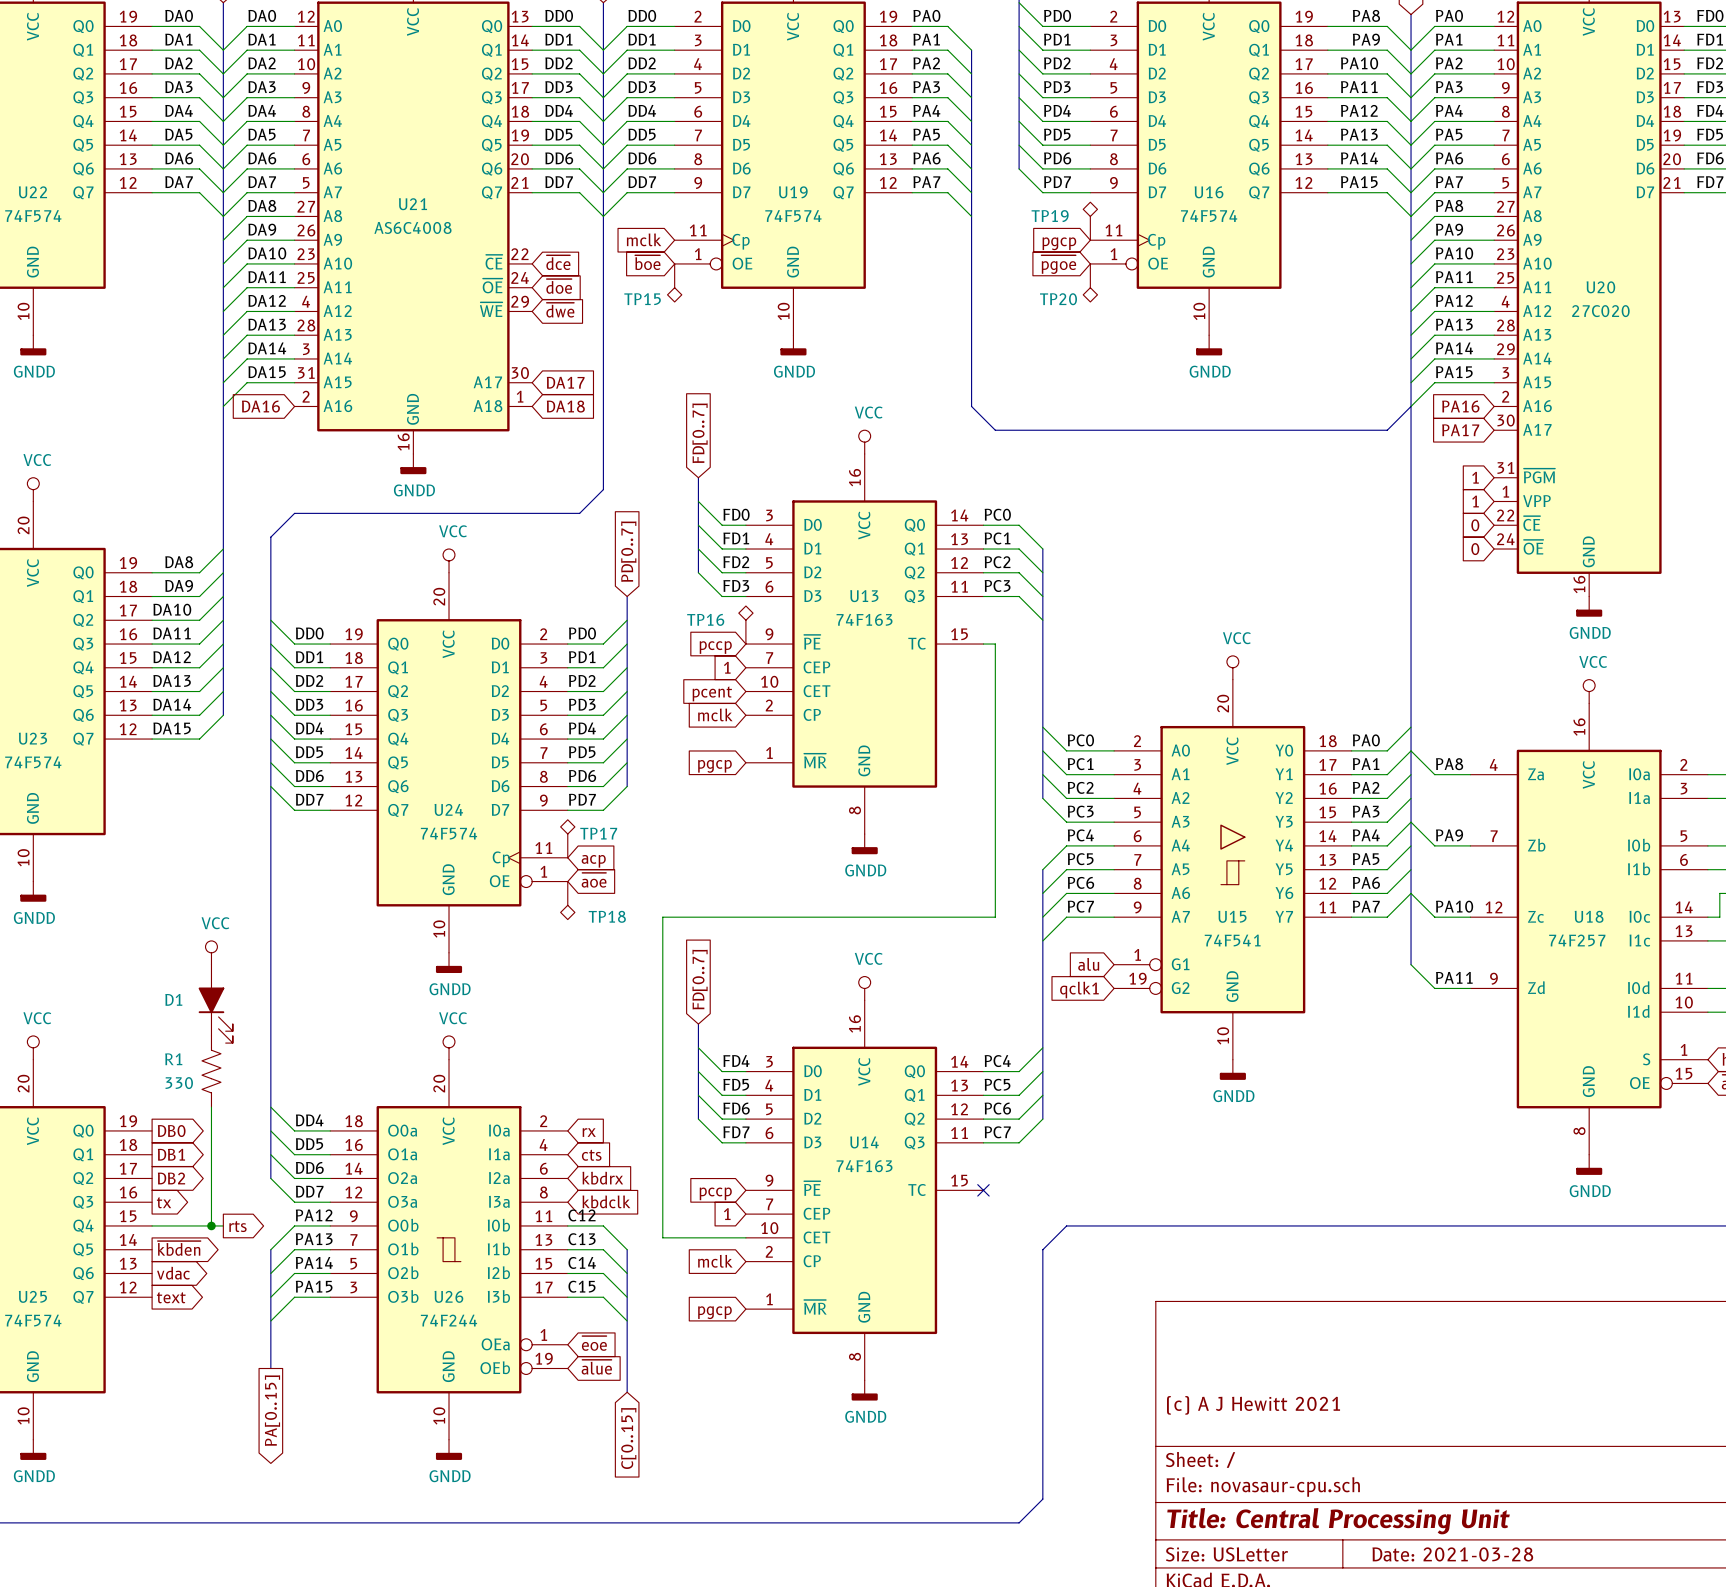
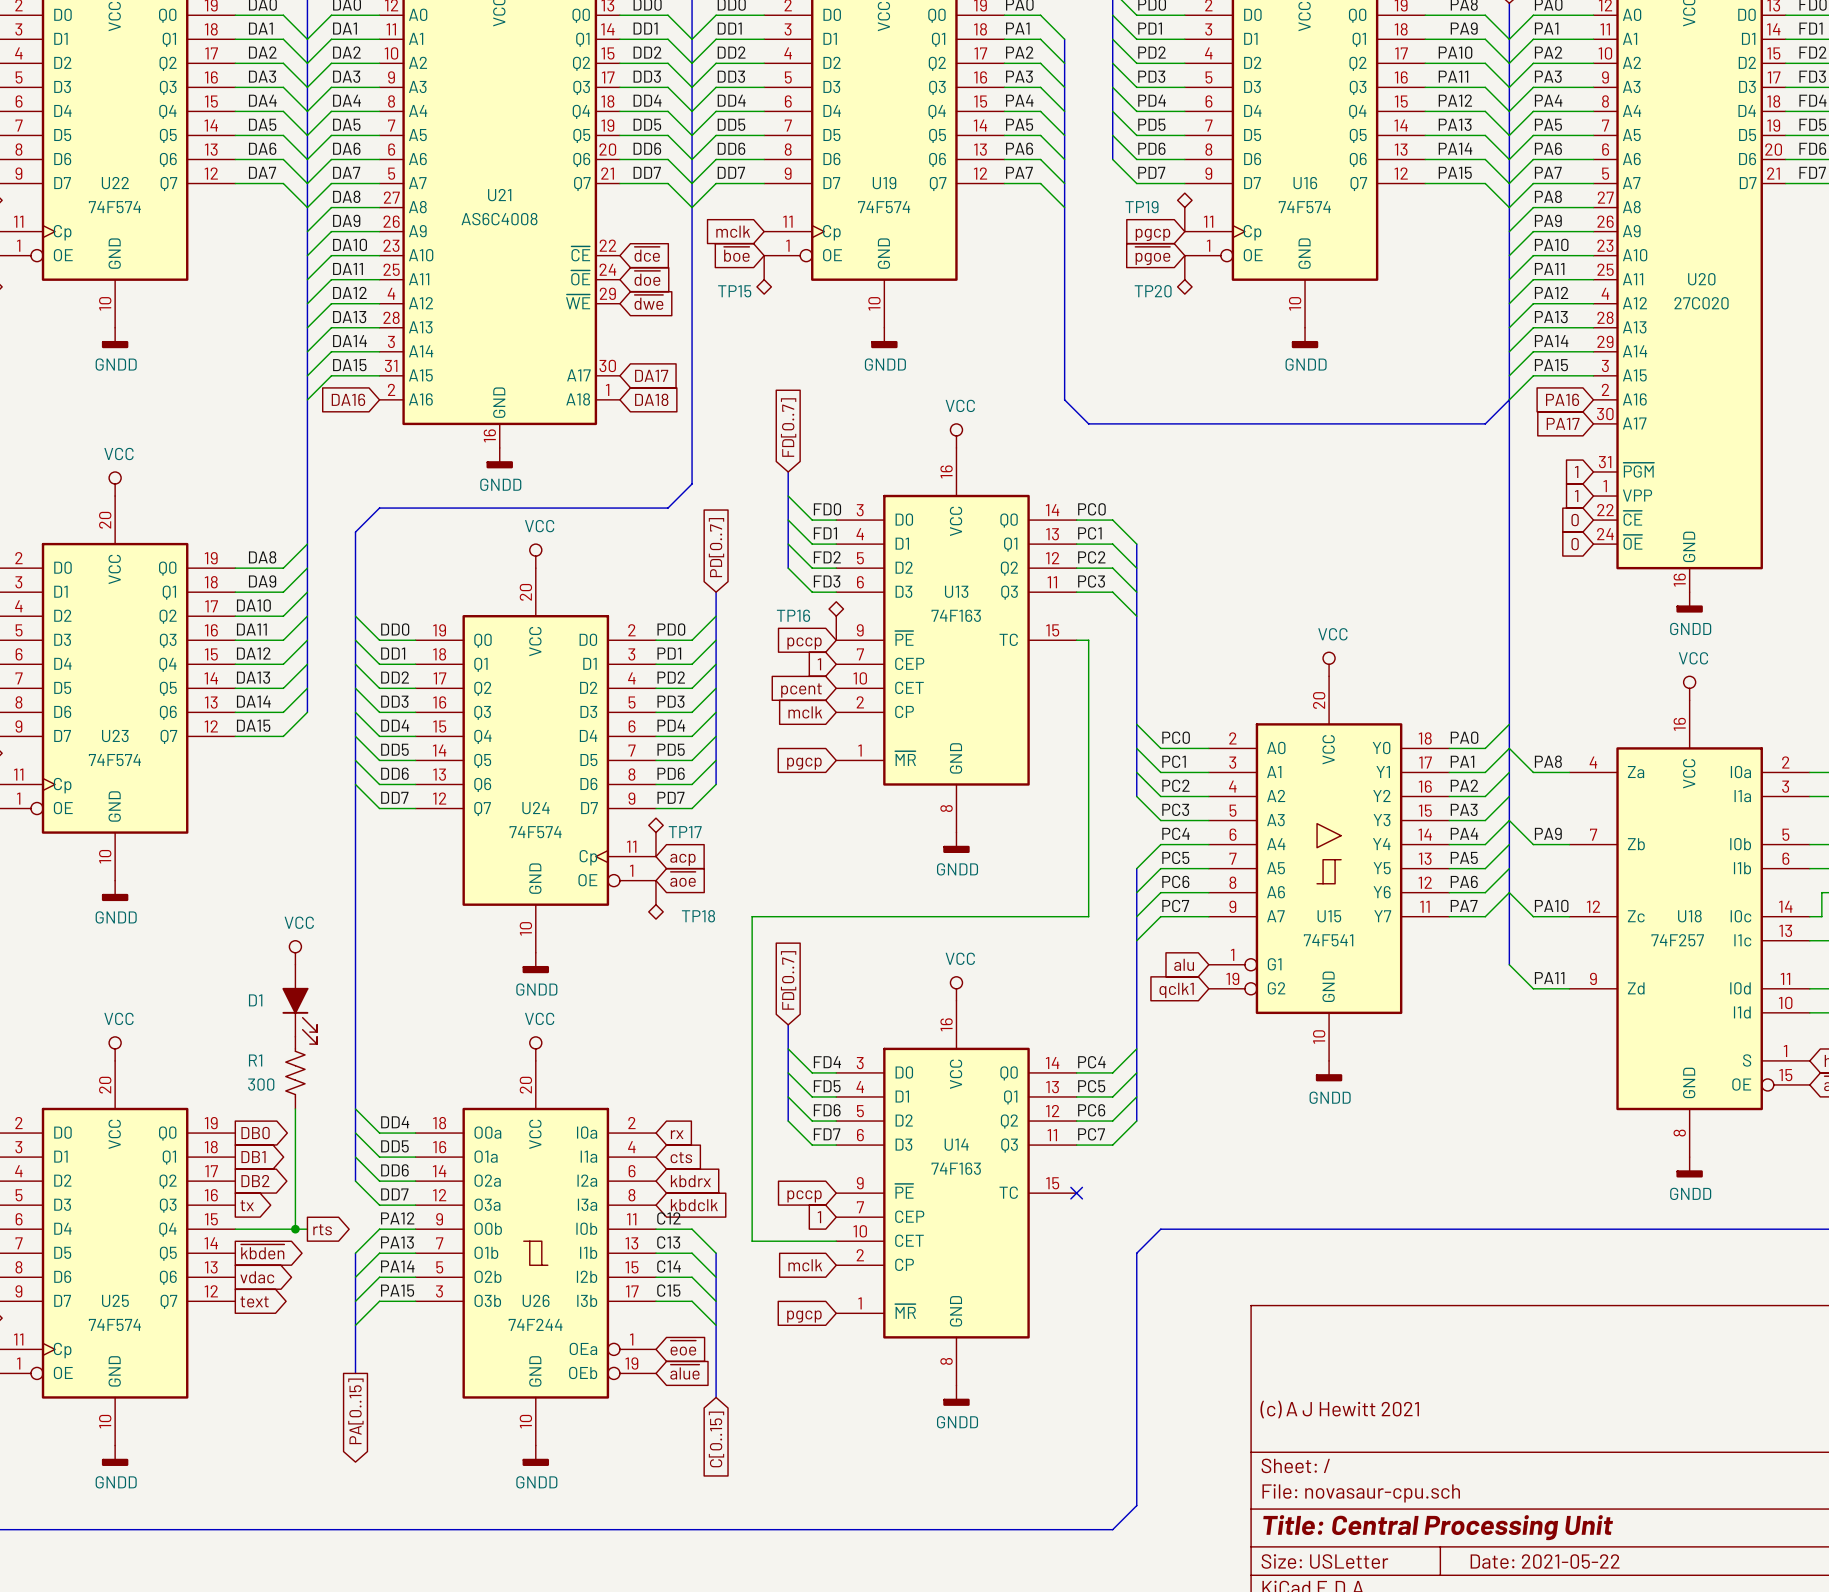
R1 value: 330 (179, 1083) -> 300 (261, 1084)
title block: Date: 2021-03-28 (1452, 1554) -> Date: 2021-05-22 (1545, 1561)

